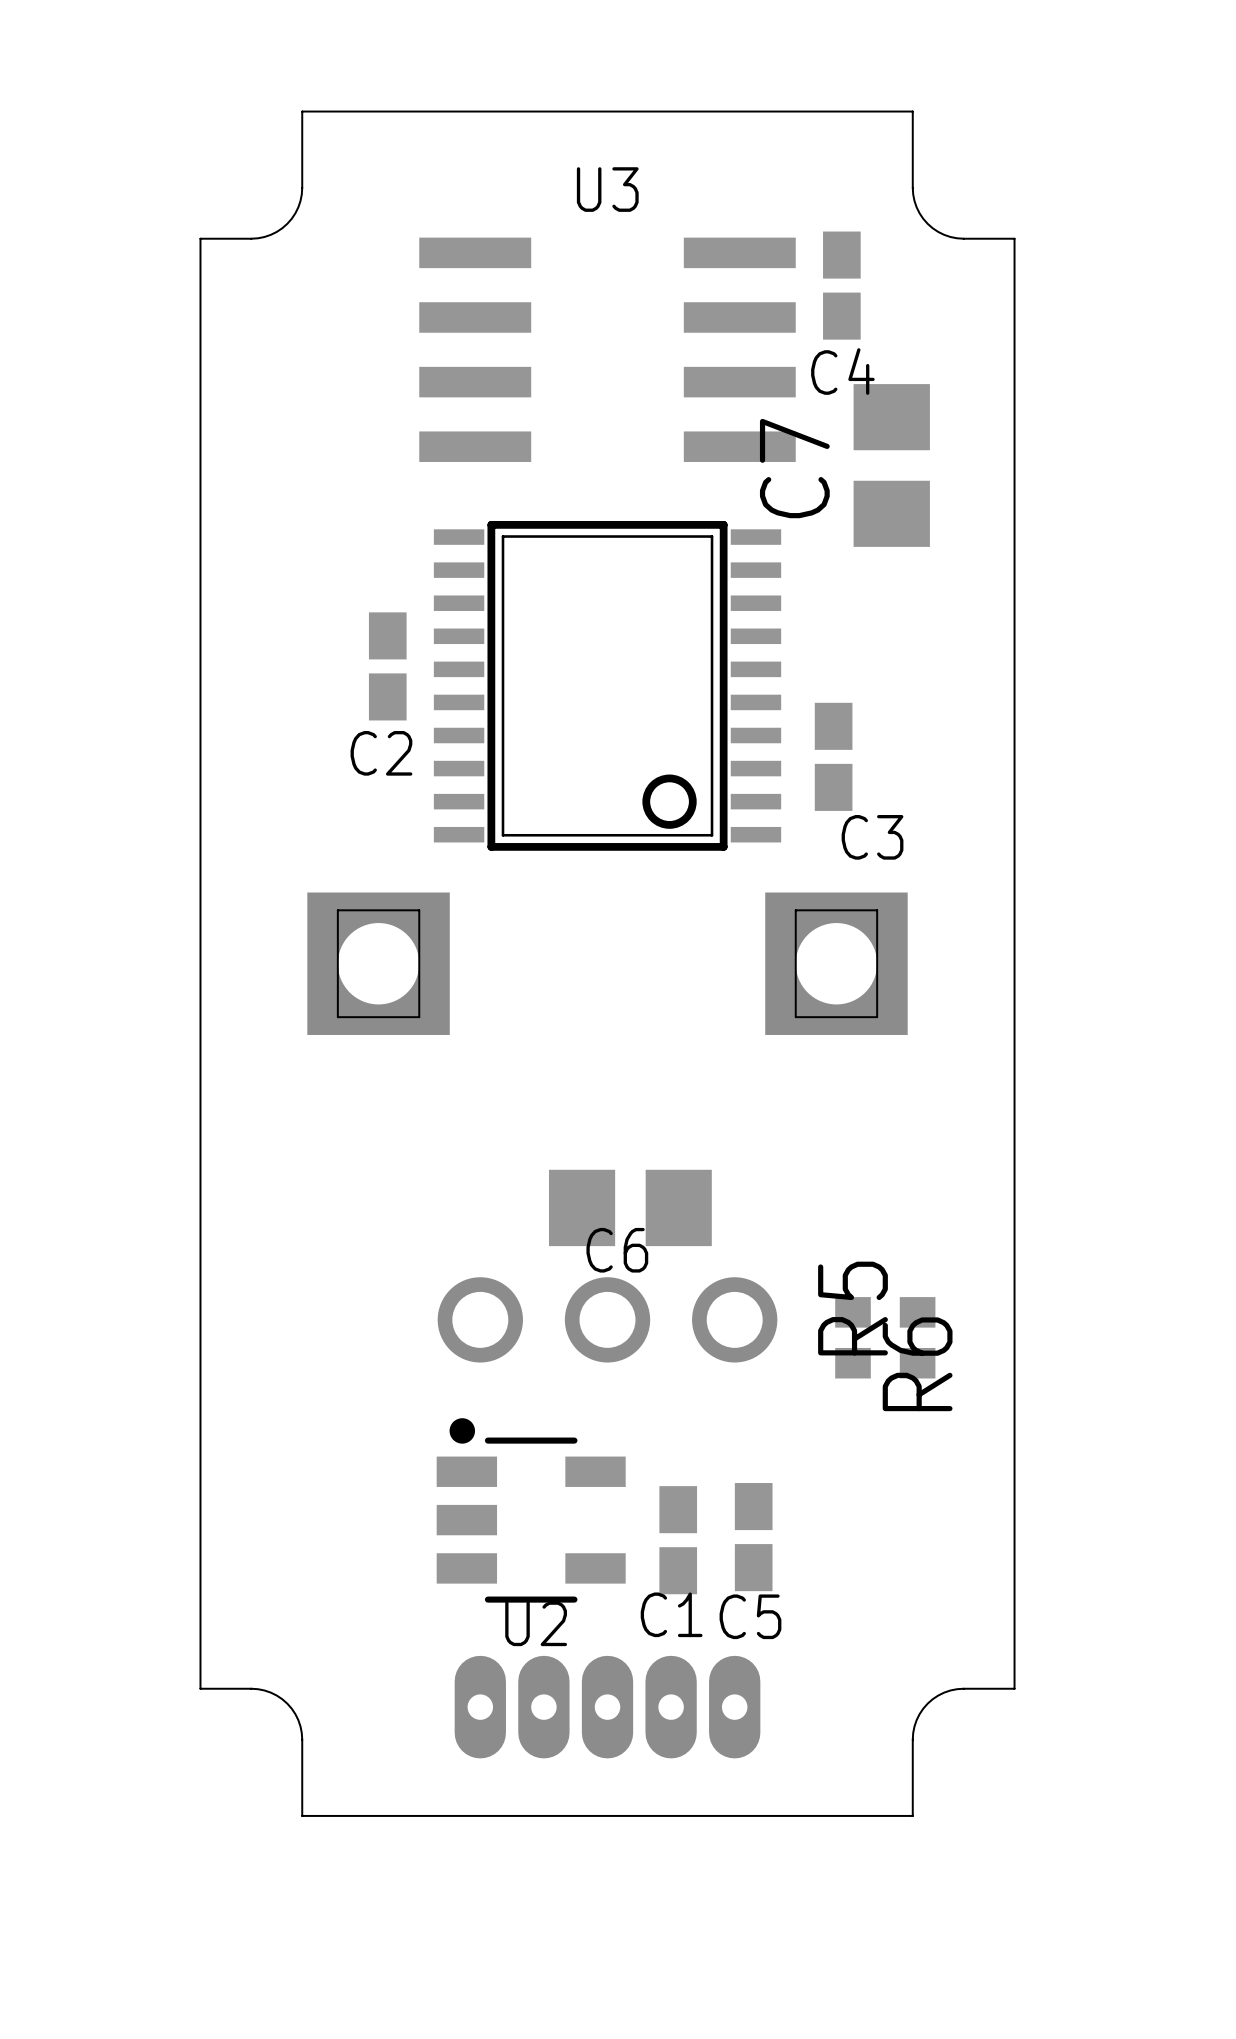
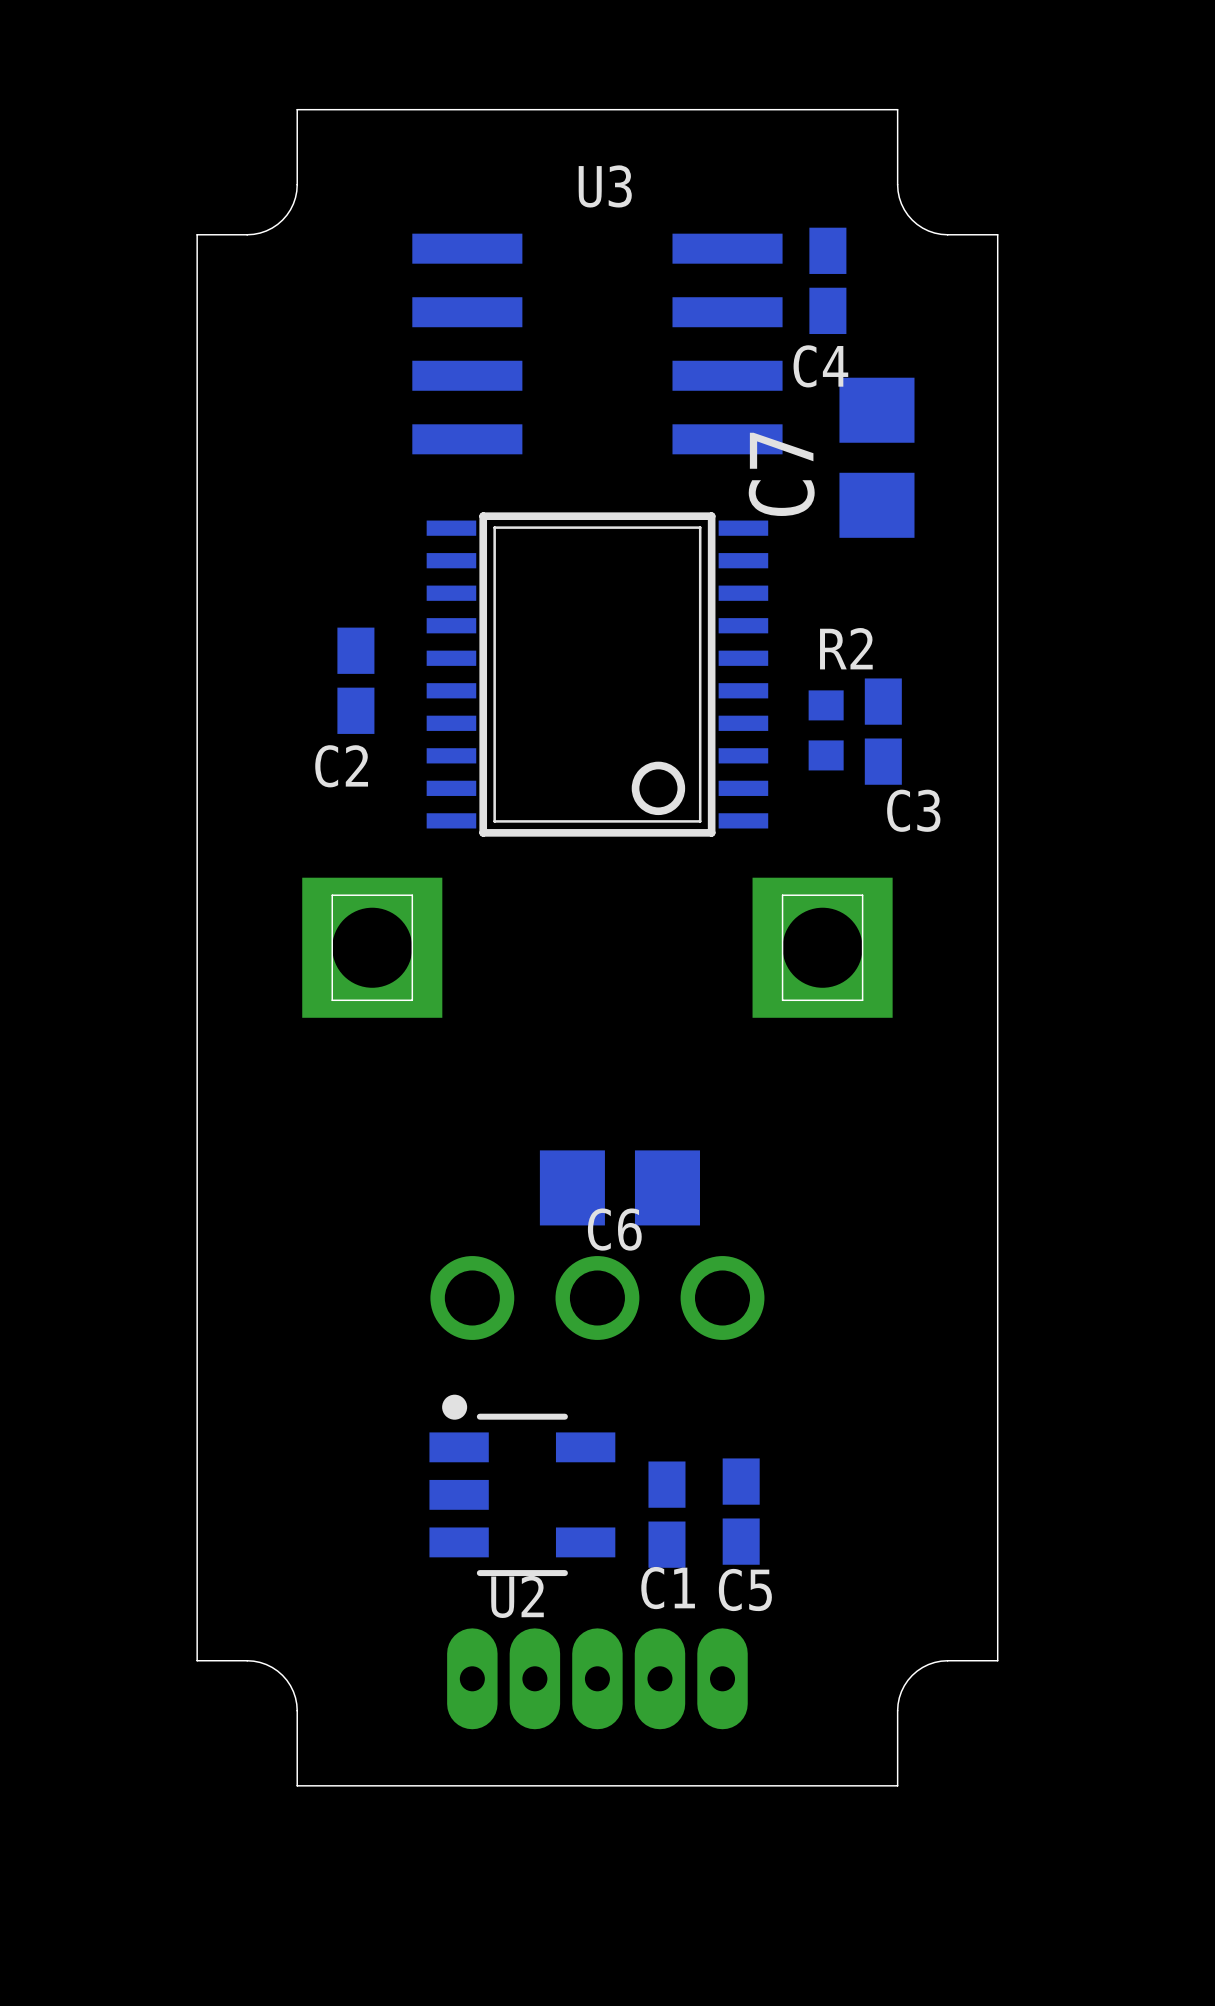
C2 position: (387, 666) -> (355, 680)
R2: none -> (826, 730)
C3 position: (833, 756) -> (883, 731)
R6: (852, 1337) -> none
R5: (917, 1337) -> none

